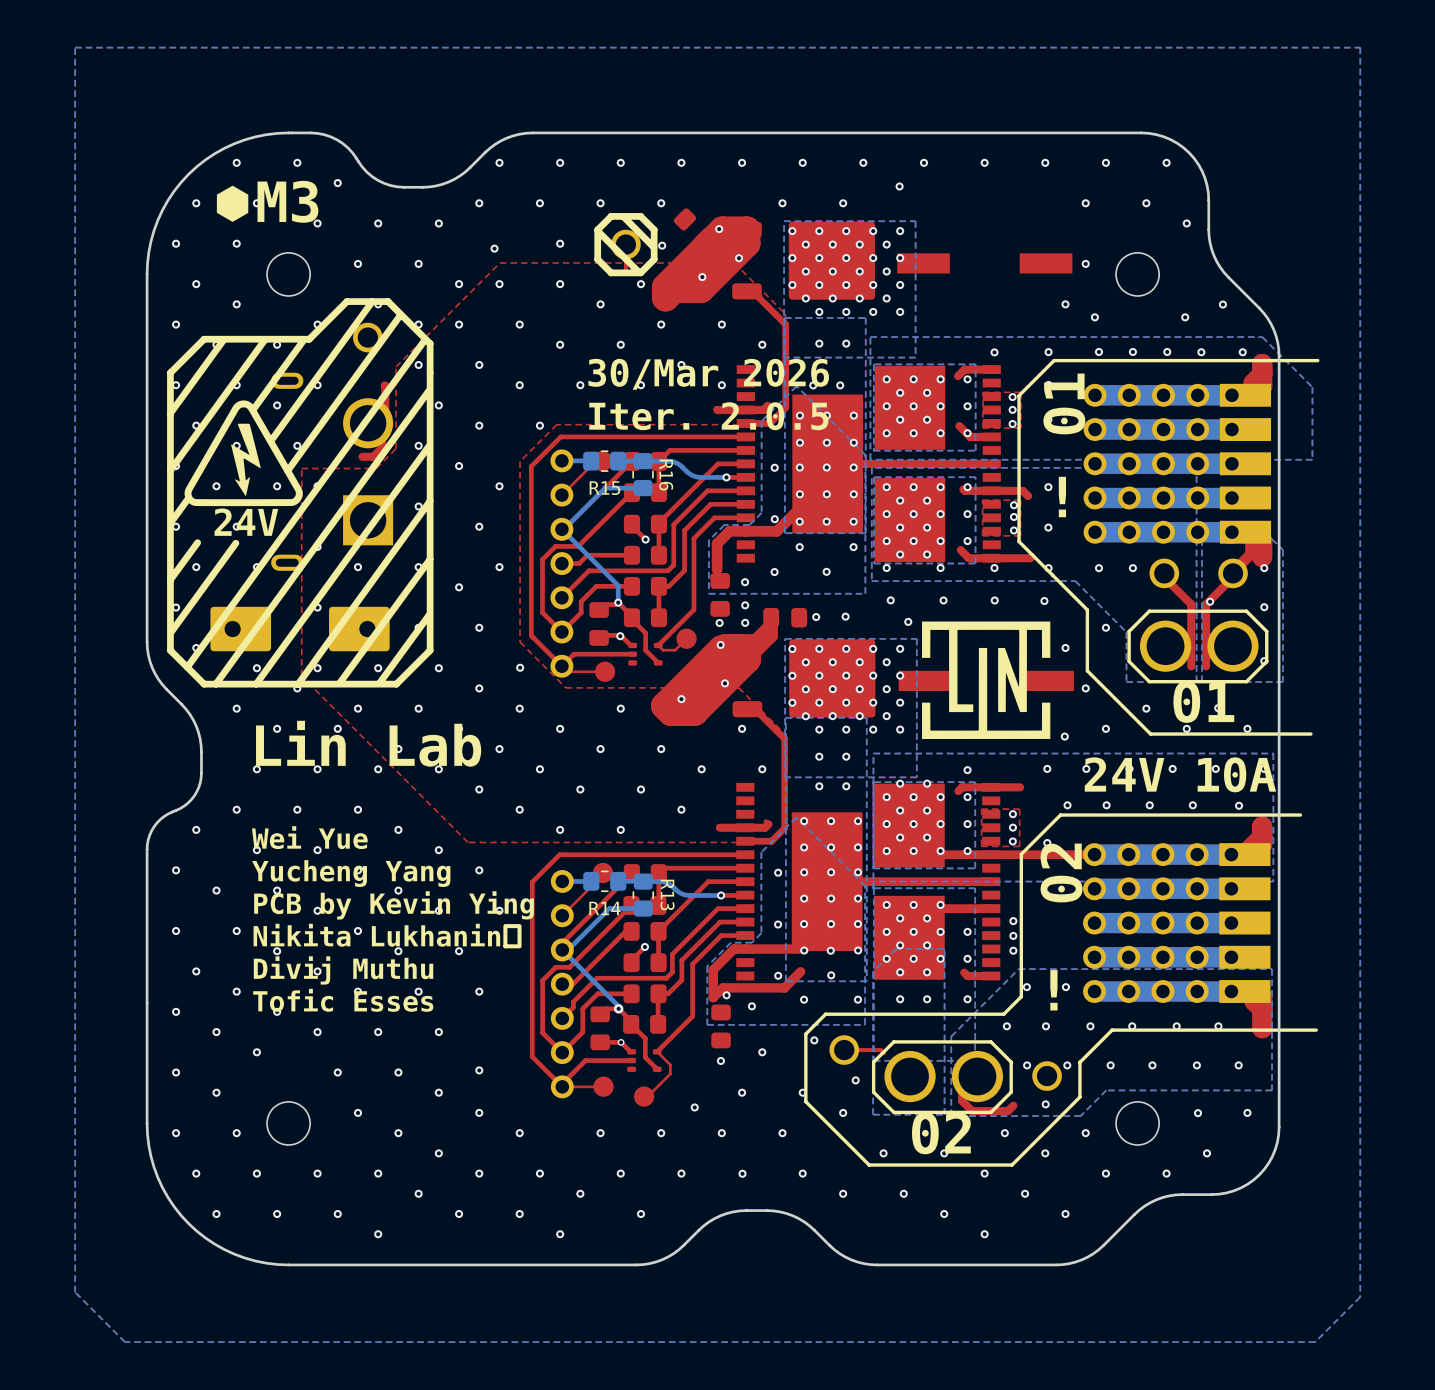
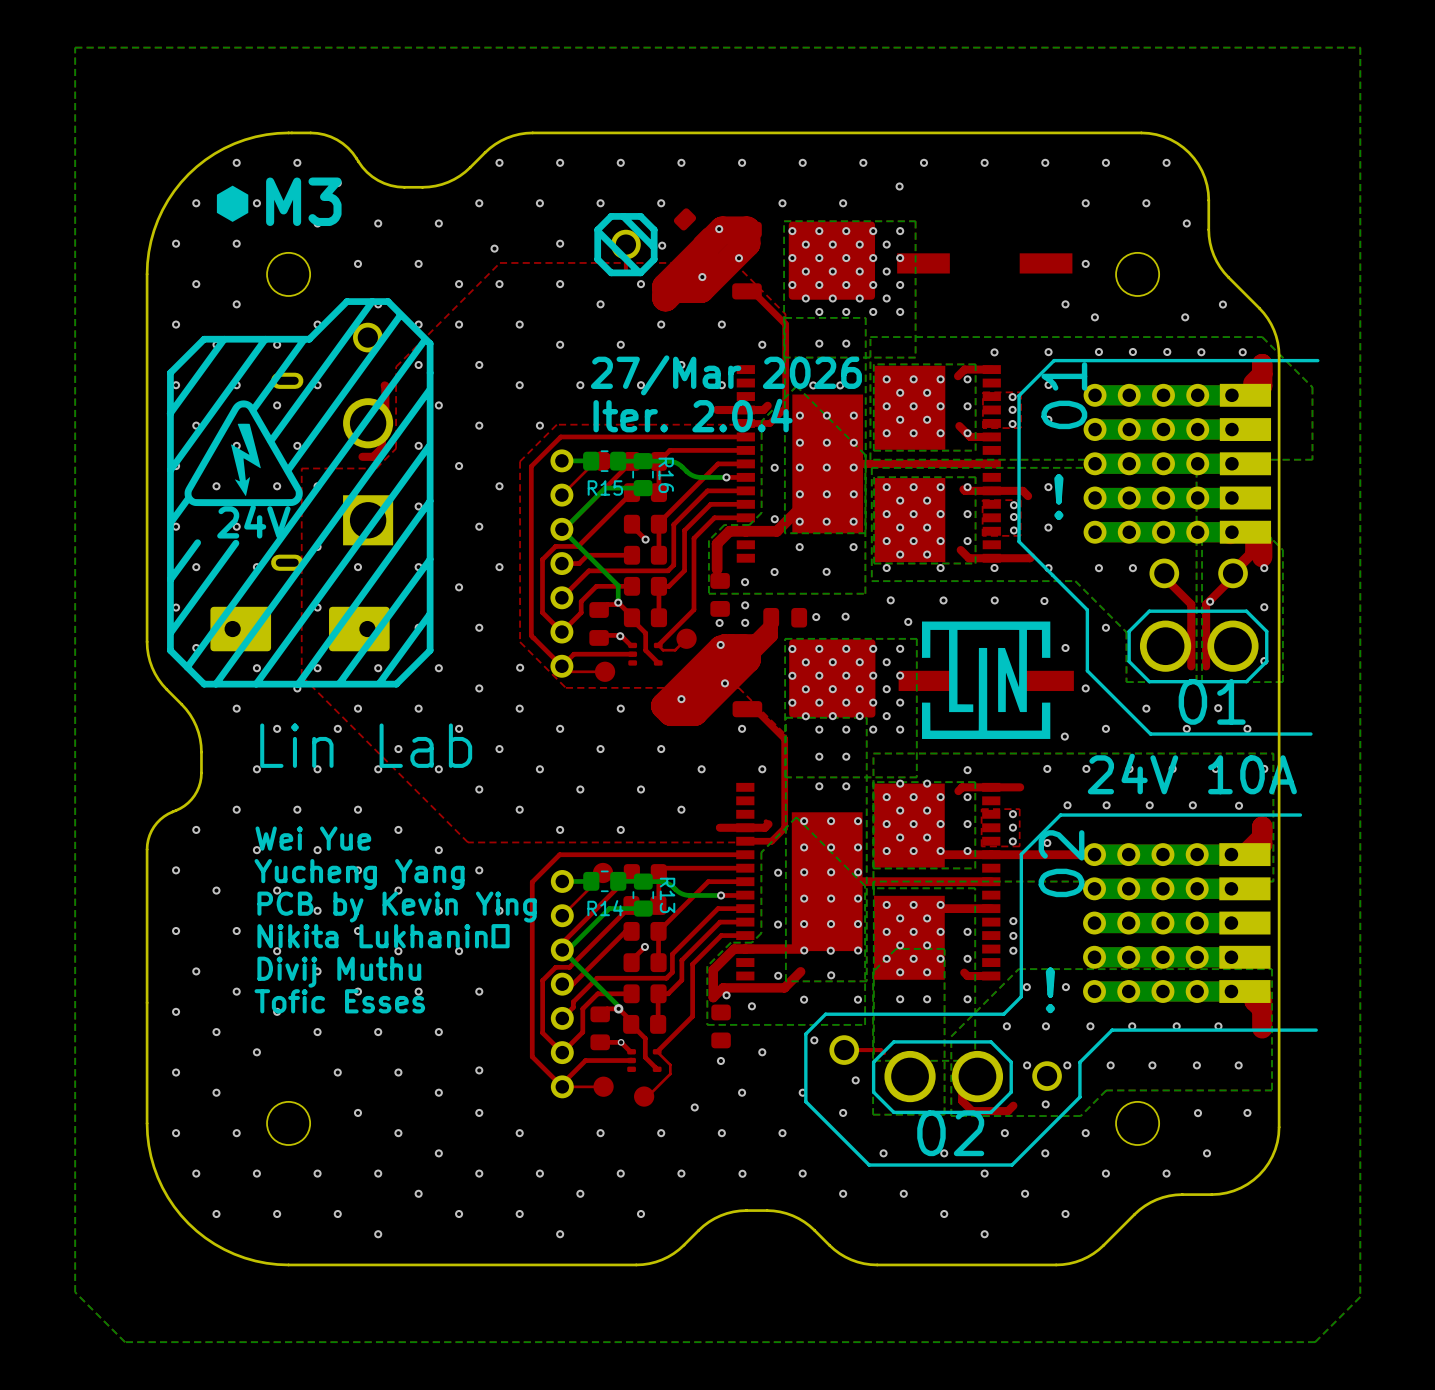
text: 30/Mar 2026 (708, 374) -> 27/Mar 2026 (726, 375)
text: Iter. 2.0.5 (708, 416) -> Iter. 2.0.4 (693, 415)

